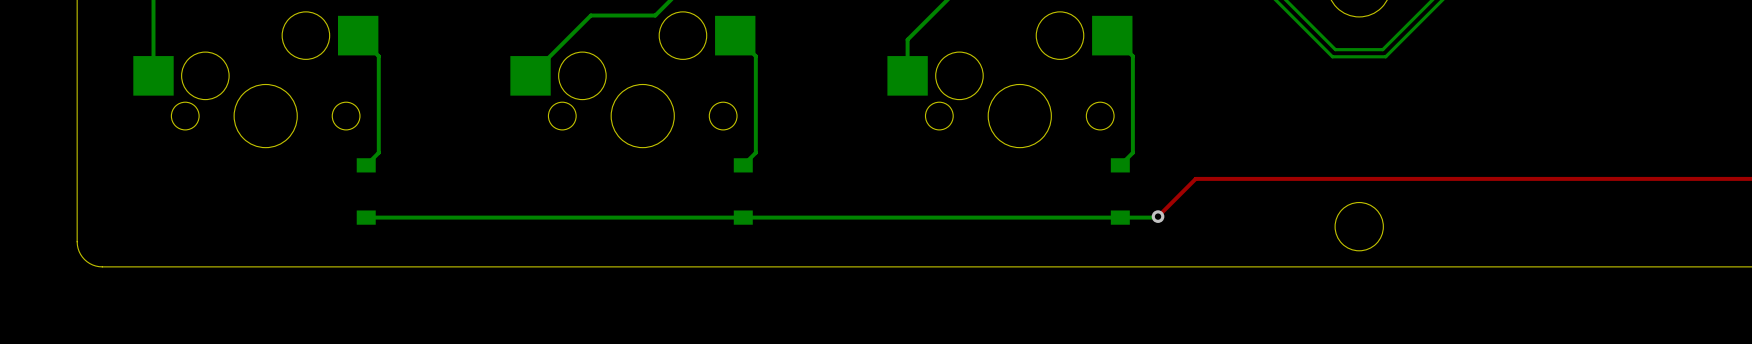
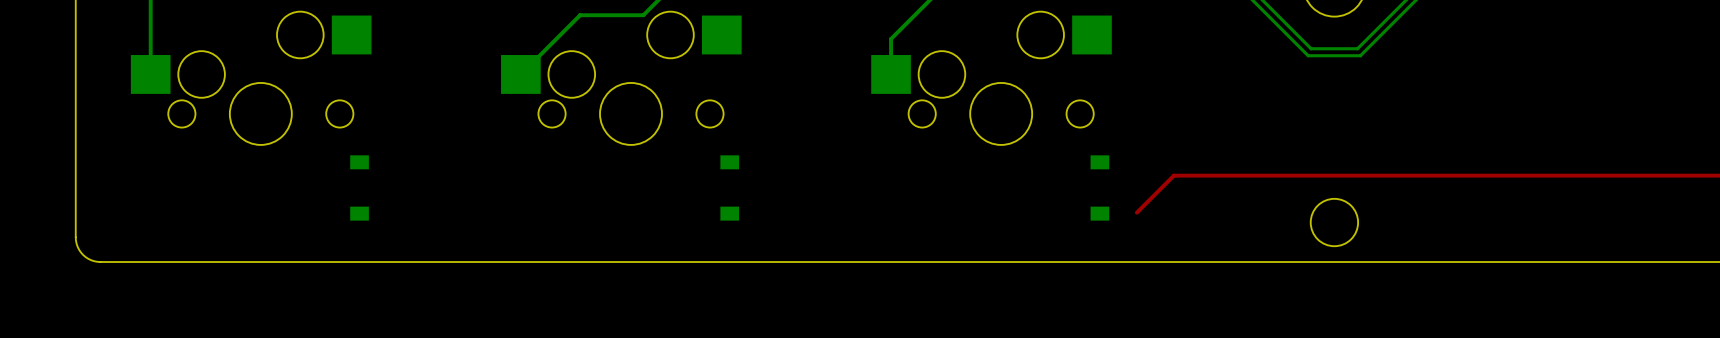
bottom track: (358, 35) (378, 56) (378, 152) (366, 165) -> none
bottom track: (735, 35) (755, 56) (755, 152) (743, 165) -> none
bottom track: (1112, 35) (1132, 56) (1132, 152) (1120, 165) -> none
bottom track: (1158, 216) (366, 217) -> none
via: (1158, 216) -> none

